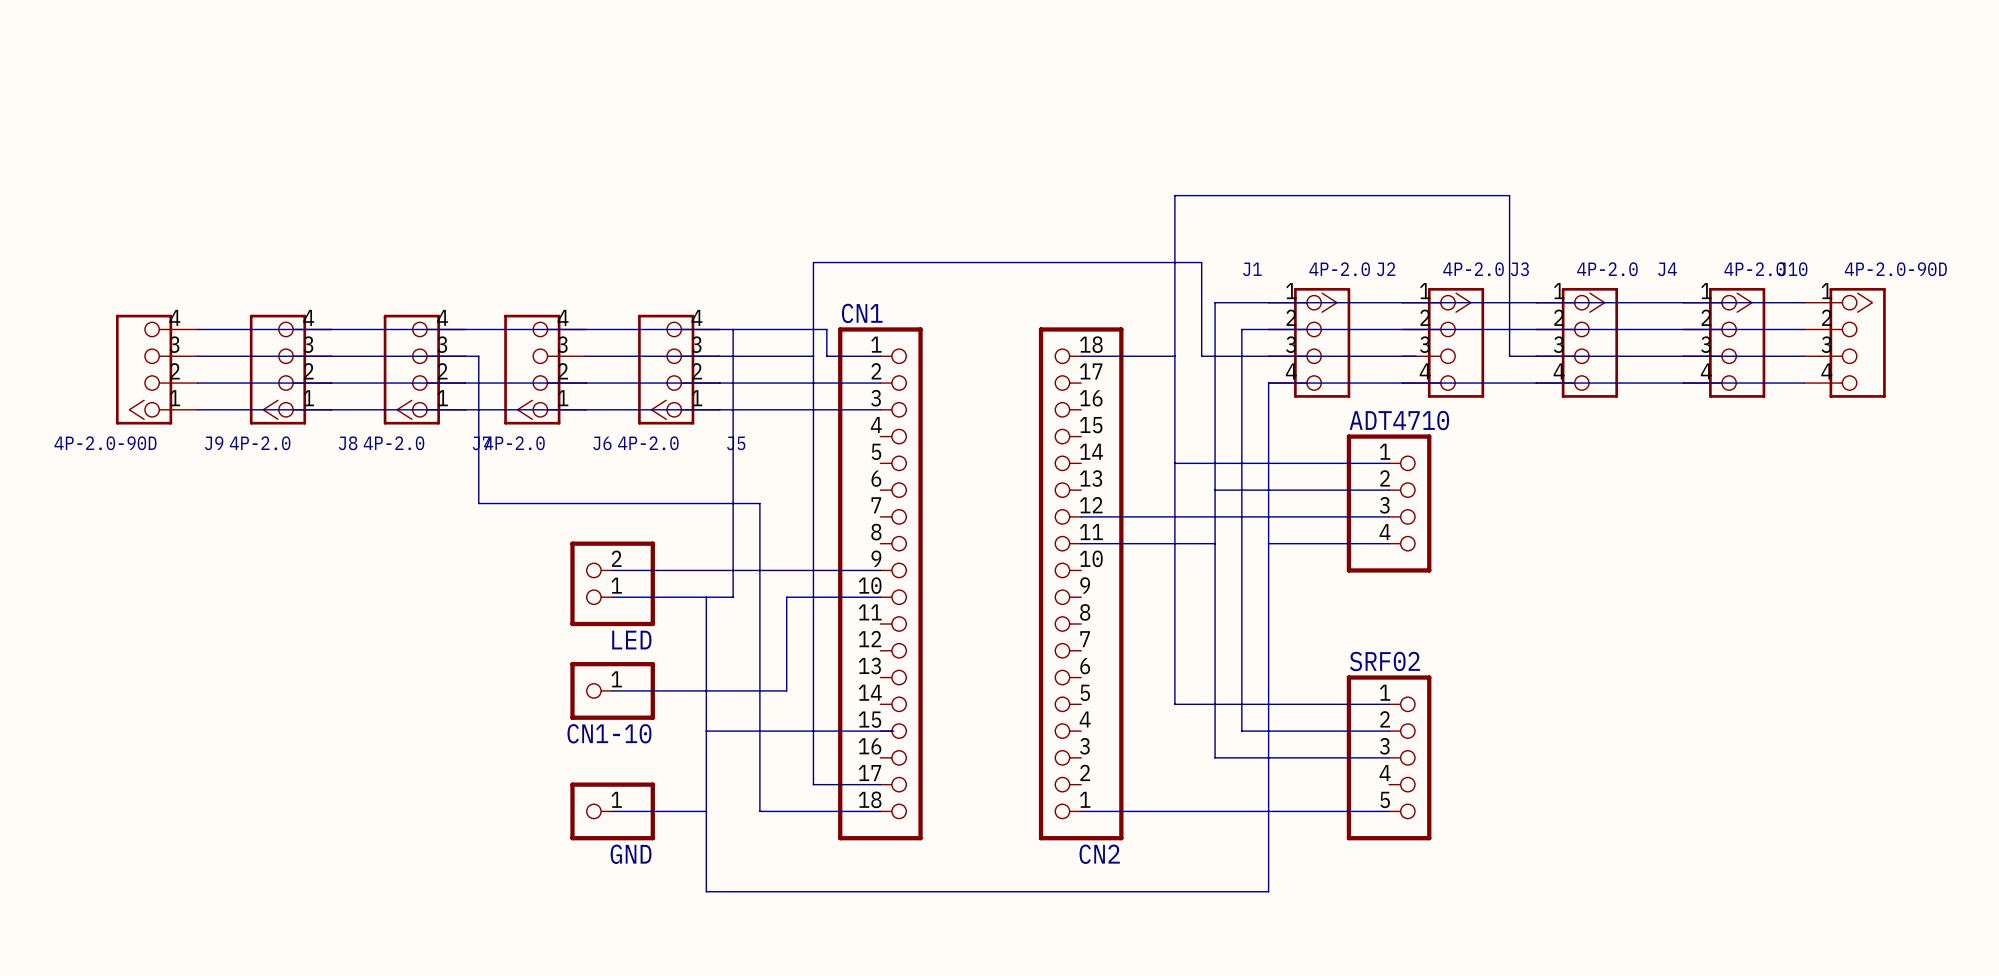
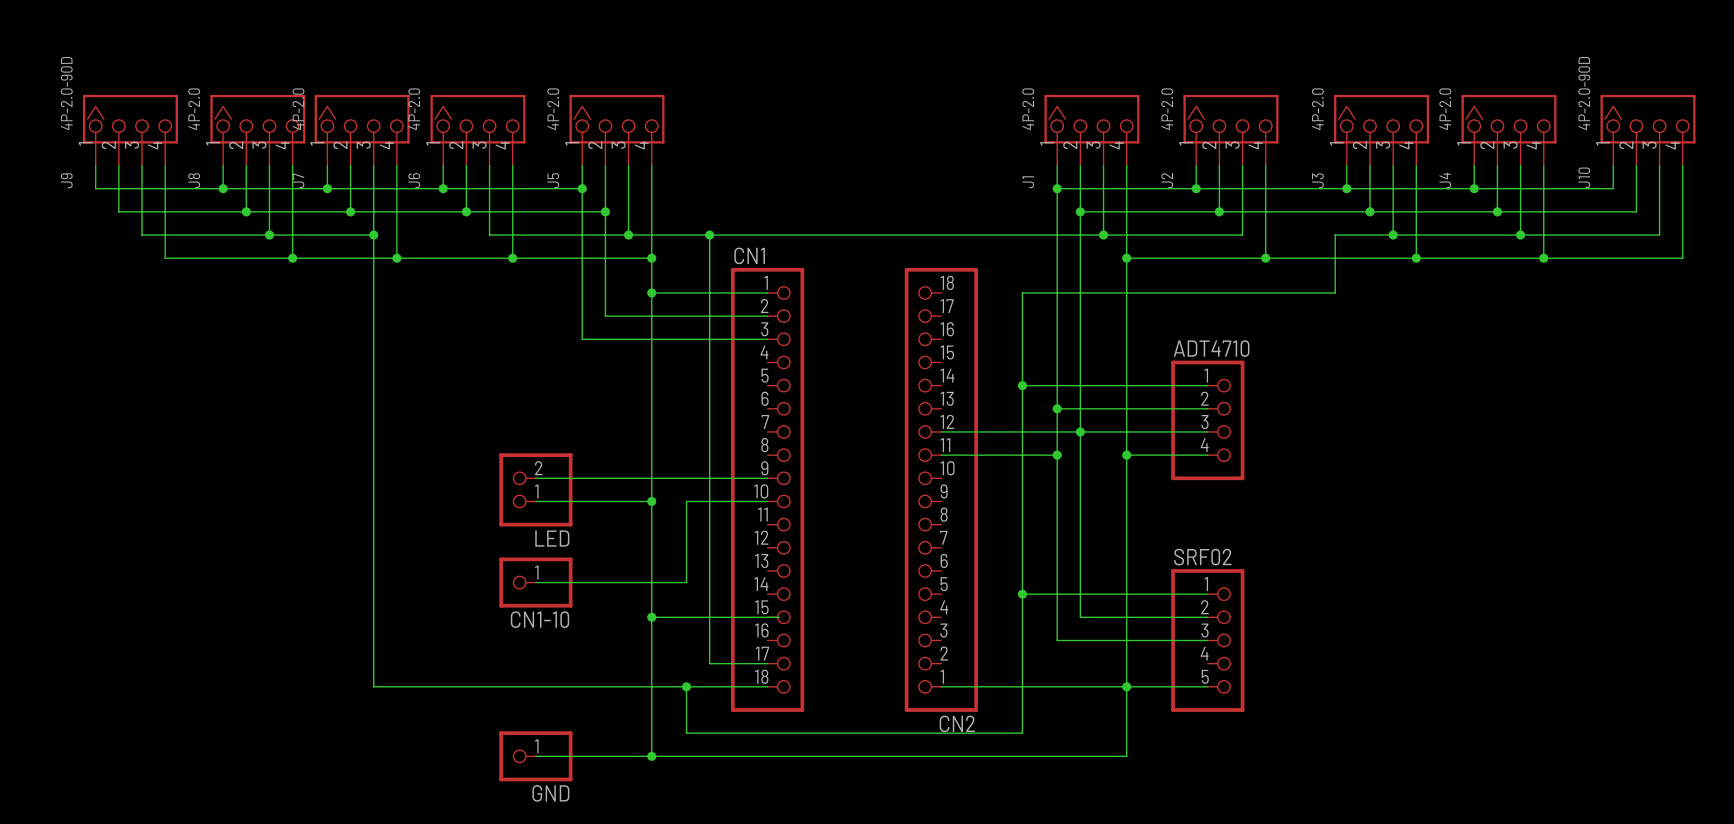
wire: none -> (95, 165) (95, 188) (582, 188)
wire: none -> (118, 165) (118, 211) (605, 211)
wire: none -> (142, 165) (142, 235) (373, 235)
wire: none -> (165, 165) (165, 258) (651, 258)
wire: none -> (223, 165) (223, 188)
wire: none -> (246, 165) (246, 211)
wire: none -> (269, 165) (269, 235)
wire: none -> (292, 165) (292, 258)
wire: none -> (327, 165) (327, 188)
wire: none -> (350, 165) (350, 211)
wire: none -> (373, 165) (373, 686) (535, 686)
wire: none -> (396, 165) (396, 258)
wire: none -> (443, 165) (443, 188)
wire: none -> (466, 165) (466, 211)
wire: none -> (489, 165) (489, 235) (1242, 235) (1242, 165)
wire: none -> (512, 165) (512, 258)
wire: none -> (628, 165) (628, 235)
wire: none -> (651, 165) (651, 756)
wire: none -> (1103, 165) (1103, 235)
wire: none -> (1196, 165) (1196, 188)
wire: none -> (1219, 165) (1219, 211)
wire: none -> (1265, 165) (1265, 258)
wire: none -> (1346, 165) (1346, 188)
wire: none -> (1369, 165) (1369, 211)
wire: none -> (1393, 165) (1393, 235)
wire: none -> (1416, 165) (1416, 258)
wire: none -> (1474, 165) (1474, 188)
wire: none -> (1497, 165) (1497, 211)
wire: none -> (1520, 165) (1520, 235)
wire: none -> (1543, 165) (1543, 258)
wire: none -> (1613, 165) (1613, 188) (1057, 188)
wire: none -> (1636, 165) (1636, 211) (1080, 211)
wire: none -> (1682, 165) (1682, 258) (1126, 258)
junction: none -> (223, 188)
junction: none -> (327, 188)
junction: none -> (443, 188)
junction: none -> (582, 188)
junction: none -> (1057, 188)
junction: none -> (1196, 188)
junction: none -> (1346, 188)
junction: none -> (1474, 188)
junction: none -> (246, 211)
junction: none -> (350, 211)
junction: none -> (466, 211)
junction: none -> (605, 211)
junction: none -> (1080, 211)
junction: none -> (1219, 211)
junction: none -> (1369, 211)
junction: none -> (1497, 211)
junction: none -> (269, 235)
junction: none -> (373, 235)
junction: none -> (628, 235)
wire: (813, 289) (813, 262) (1201, 262) (1201, 356) -> (1022, 292) (1045, 292)
junction: none -> (709, 235)
junction: none -> (1103, 235)
junction: none -> (1393, 235)
junction: none -> (1520, 235)
wire: (1215, 302) (1804, 302) -> (1057, 246) (1057, 165)
junction: none -> (292, 258)
junction: none -> (396, 258)
junction: none -> (512, 258)
junction: none -> (651, 258)
junction: none -> (1126, 258)
junction: none -> (1265, 258)
junction: none -> (1416, 258)
junction: none -> (1543, 258)
wire: (197, 329) (826, 329) (826, 356) -> (709, 292) (721, 292)
wire: (733, 329) (733, 597) -> (651, 501) (640, 501)
wire: (1241, 329) (1804, 329) -> (1080, 269) (1080, 165)
J1 position: (1309, 342) -> (1091, 130)
J1 rotation: 0° (1322, 342) -> 90° counterclockwise (1091, 119)
J2 position: (1443, 342) -> (1230, 130)
J2 rotation: 0° (1456, 342) -> 90° counterclockwise (1230, 119)
J3 position: (1577, 342) -> (1381, 130)
J3 rotation: 0° (1589, 342) -> 90° counterclockwise (1381, 119)
J4 position: (1724, 342) -> (1508, 130)
J4 rotation: 0° (1737, 342) -> 90° counterclockwise (1508, 119)
J10 position: (1844, 342) -> (1648, 130)
J10 rotation: 0° (1857, 342) -> 90° counterclockwise (1648, 119)
wire: (197, 356) (478, 356) (478, 503) (759, 503) (759, 811) -> (616, 686) (663, 686)
wire: (585, 356) (746, 356) -> none
junction: none -> (651, 292)
wire: (1081, 356) (1174, 356) (1174, 195) (1509, 195) (1509, 356) -> (1230, 292) (1312, 292)
wire: (1536, 356) (1804, 356) -> (1335, 292) (1335, 235) (1659, 235) (1659, 165)
J9 rotation: 0° (144, 369) -> 90° clockwise (130, 119)
J9 position: (156, 369) -> (130, 130)
J8 rotation: 0° (277, 369) -> 90° clockwise (257, 119)
J8 position: (290, 369) -> (257, 130)
J7 rotation: 0° (411, 369) -> 90° clockwise (362, 119)
J7 position: (424, 369) -> (362, 130)
J6 rotation: 0° (532, 369) -> 90° clockwise (477, 119)
J6 position: (545, 369) -> (477, 130)
J5 rotation: 0° (666, 369) -> 90° clockwise (616, 119)
J5 position: (678, 369) -> (616, 130)
wire: (197, 383) (692, 383) -> (605, 165) (605, 316)
wire: (1804, 383) (1268, 383) (1268, 891) -> (1126, 165) (1126, 756) (1103, 756)
wire: (197, 409) (666, 409) -> (582, 165) (582, 339)
junction: none -> (1022, 385)
junction: none -> (1057, 408)
junction: none -> (1080, 431)
junction: none -> (1057, 455)
wire: (1268, 543) (1295, 543) -> none
junction: none -> (1126, 455)
wire: (706, 597) (706, 891) -> (535, 756) (616, 756)
junction: none -> (651, 501)
wire: none -> (1022, 594) (1022, 733) (686, 733) (686, 686)
junction: none -> (1022, 594)
wire: (706, 731) (746, 731) -> none
junction: none -> (651, 617)
GND position: (612, 811) -> (535, 756)
junction: none -> (686, 686)
junction: none -> (1126, 686)
junction: none -> (651, 756)

